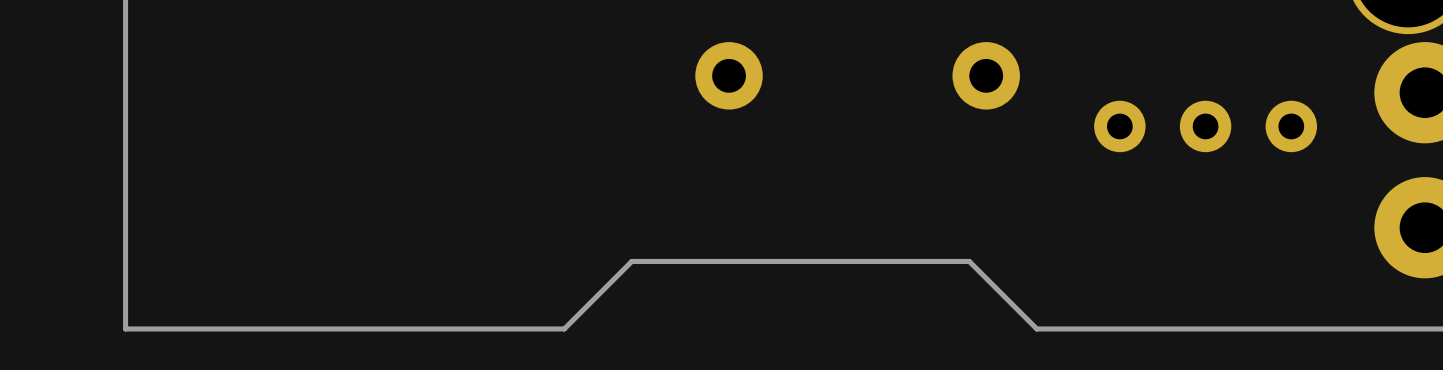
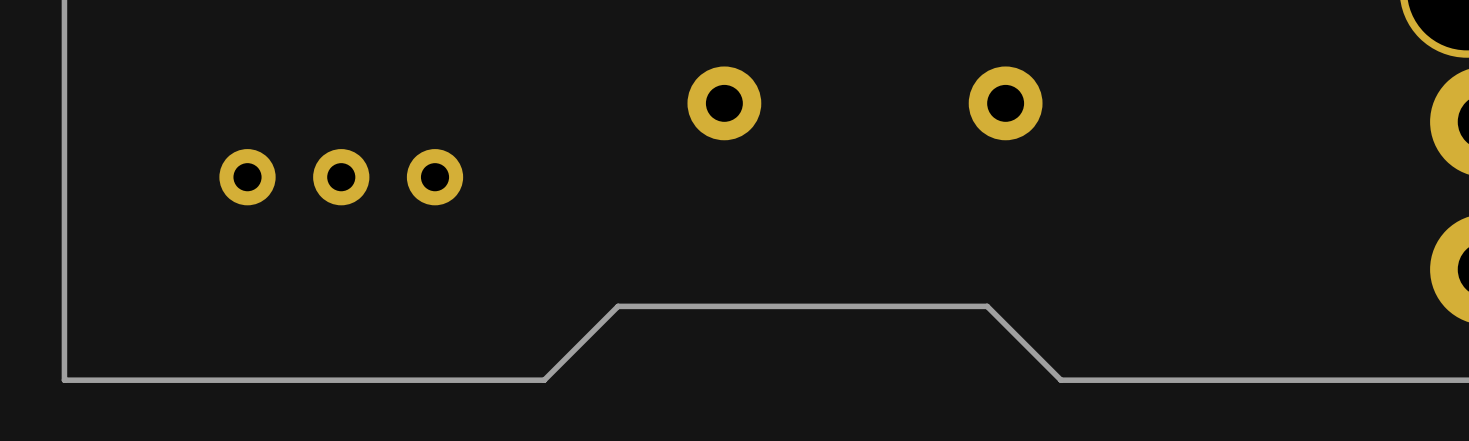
part position: (1205, 126) -> (341, 177)

